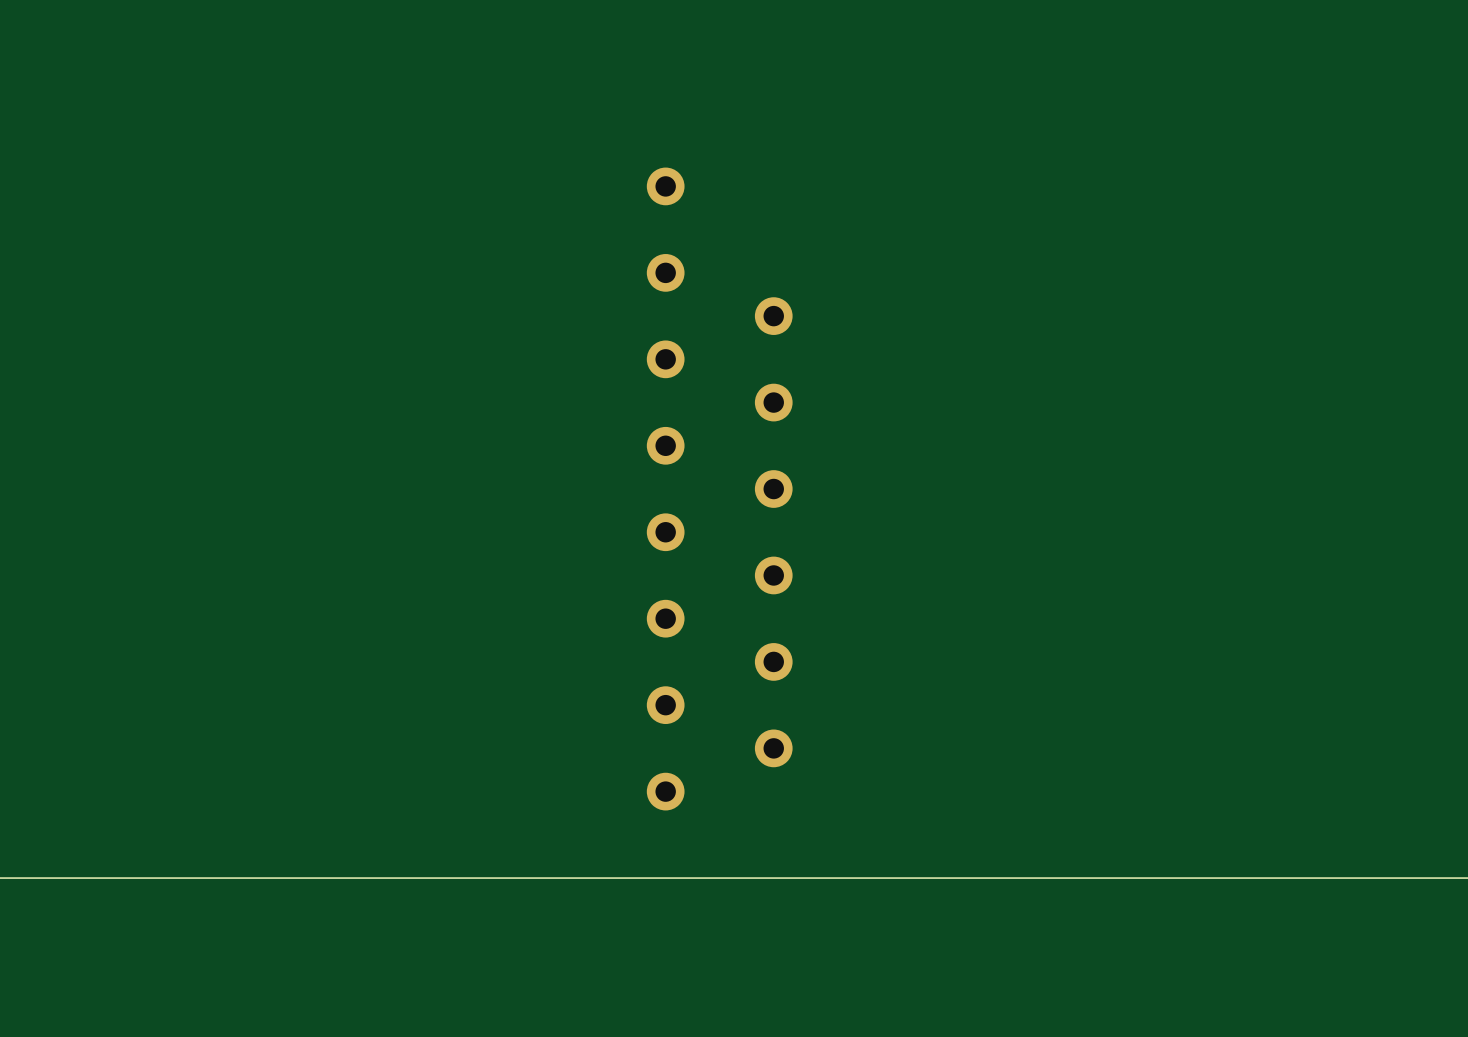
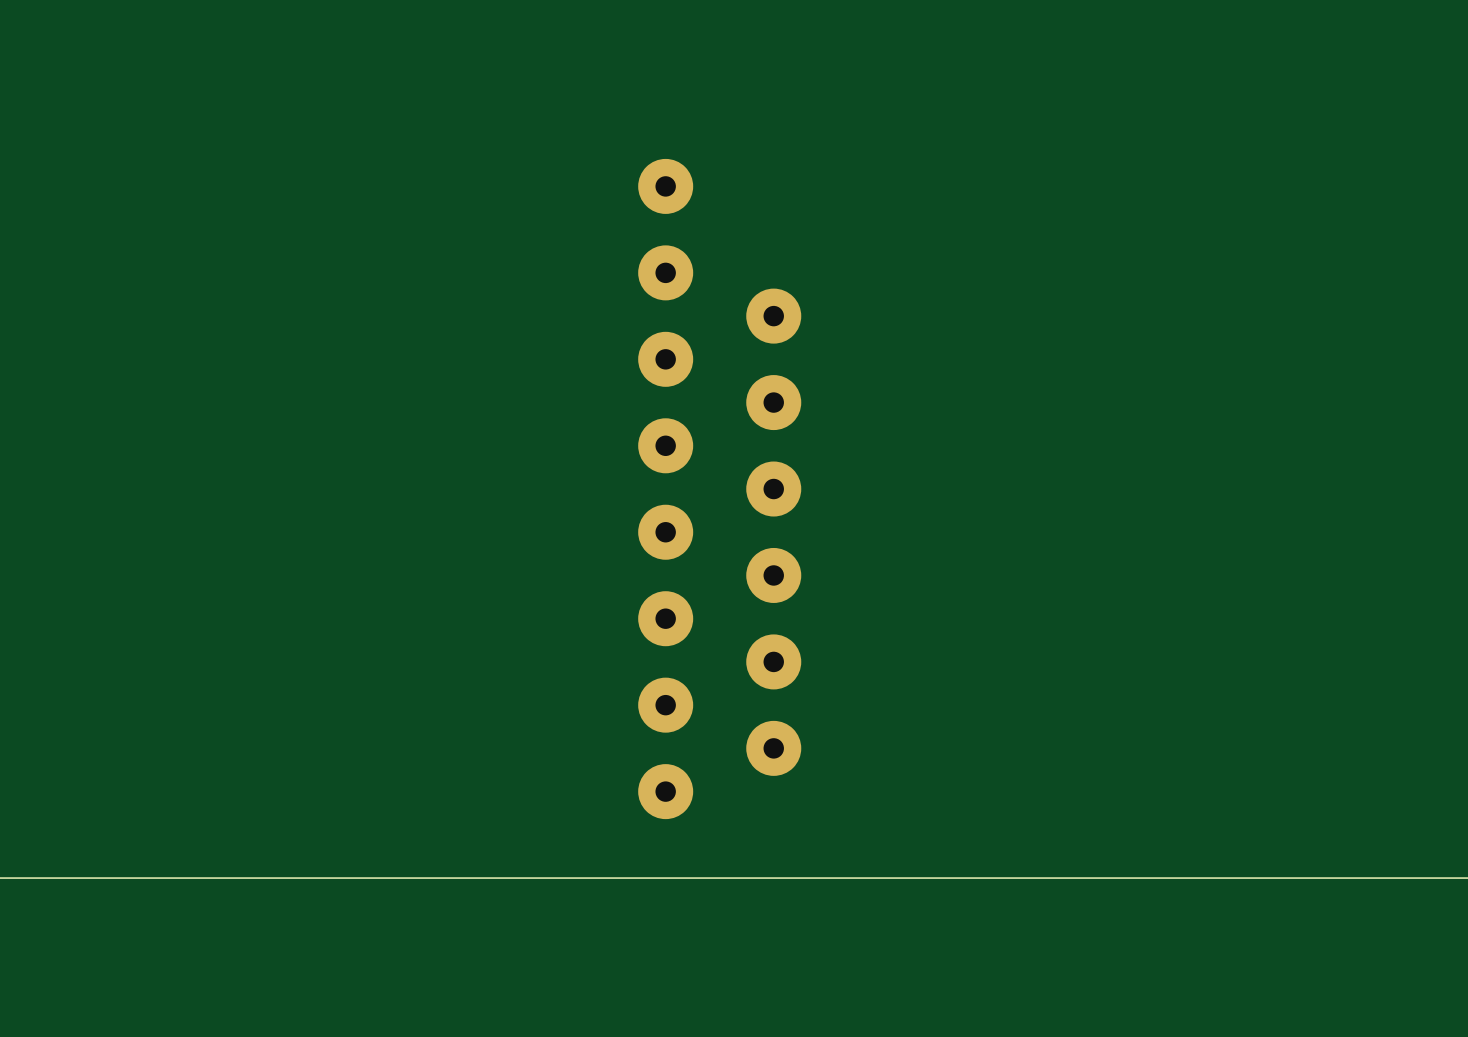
part footprint: [646, 167, 685, 811] -> [638, 158, 694, 820]
part footprint: [754, 297, 793, 768] -> [746, 288, 802, 776]

